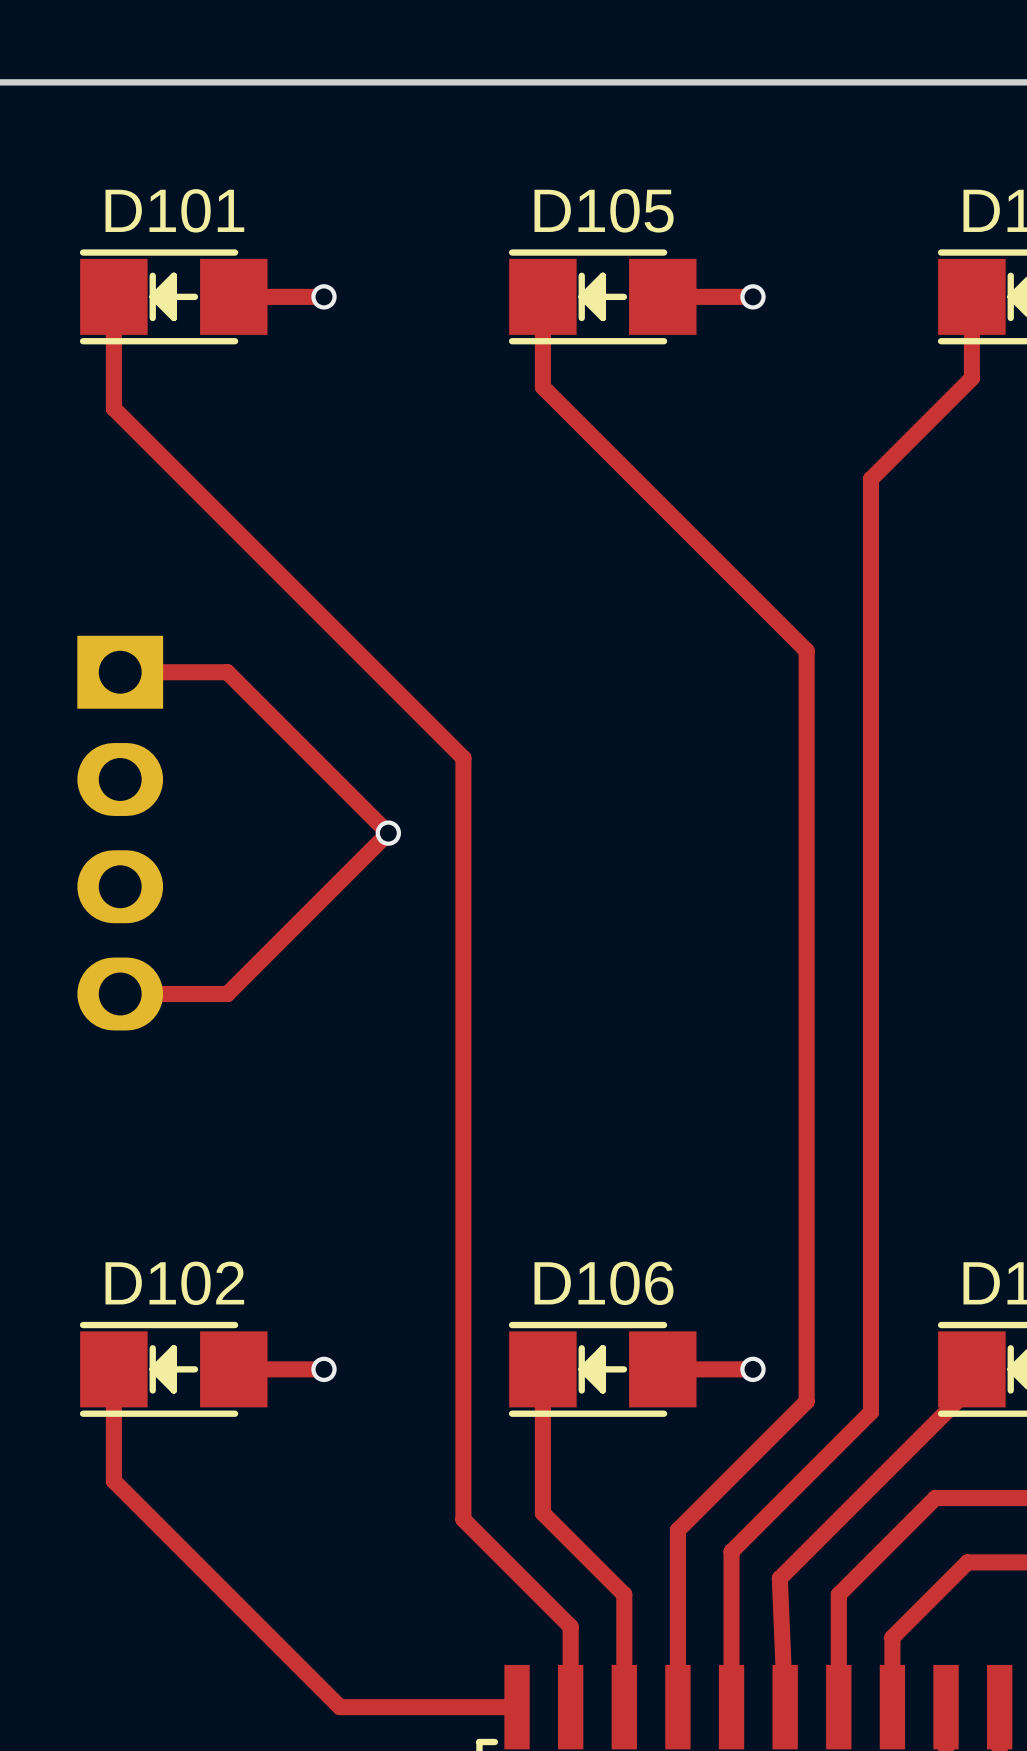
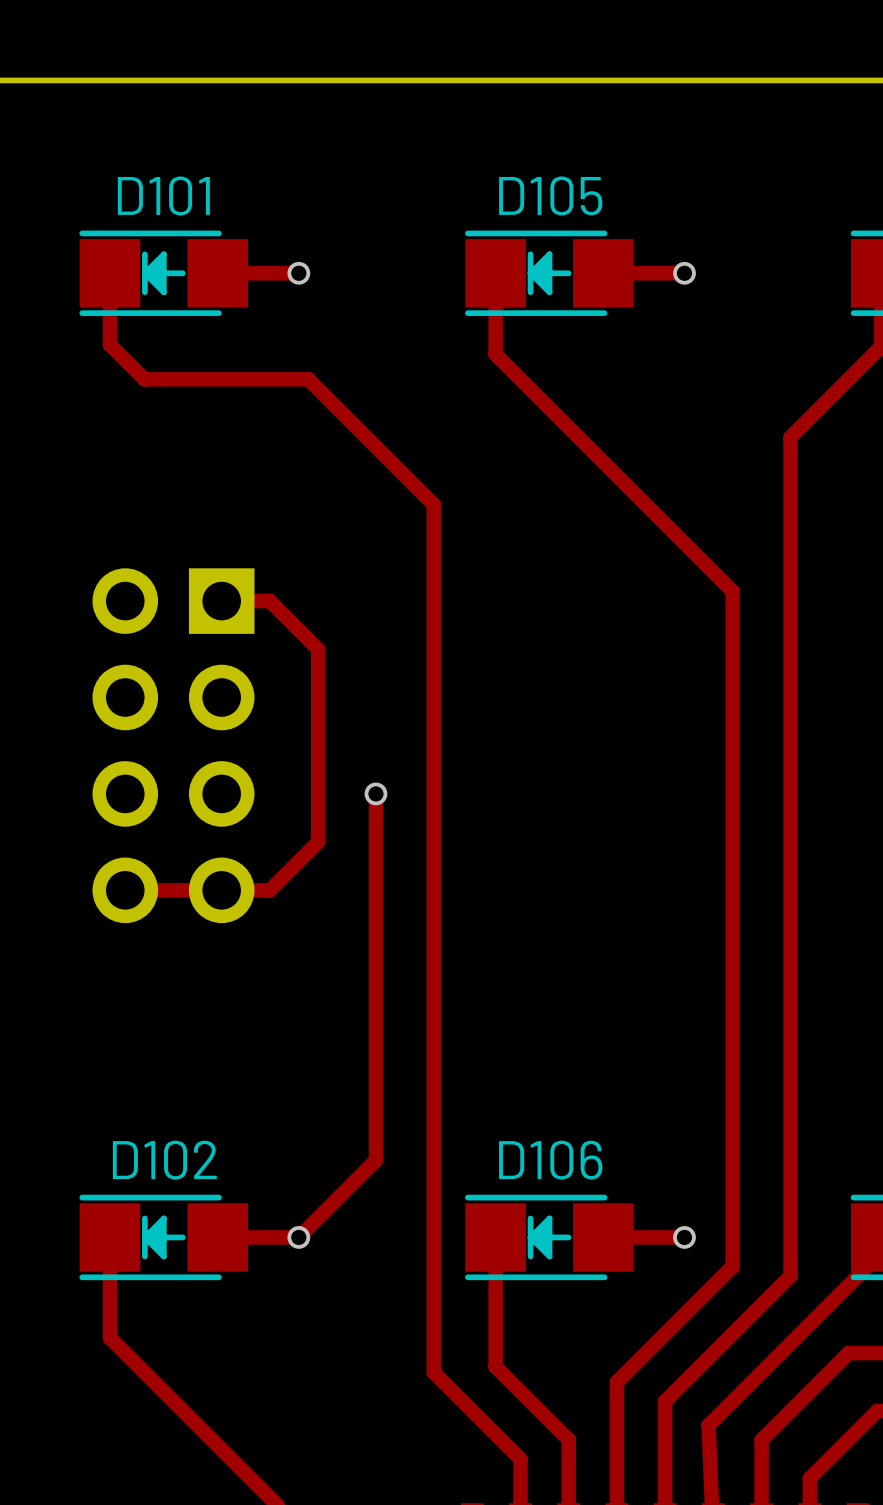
track: (113, 376) (113, 408) (463, 758) (463, 1519) (570, 1626) -> (109, 344) (144, 379) (308, 379) (433, 504) (433, 1372) (520, 1459) (520, 1468)
track: none -> (221, 601) (269, 601) (318, 649) (318, 842) (269, 890) (125, 890)
track: (120, 672) (227, 672) (388, 833) (227, 994) (120, 994) -> none
part: none -> (173, 745)
part: (120, 833) -> none
via position: (388, 833) -> (375, 793)
track: none -> (375, 793) (375, 1160) (298, 1237)

